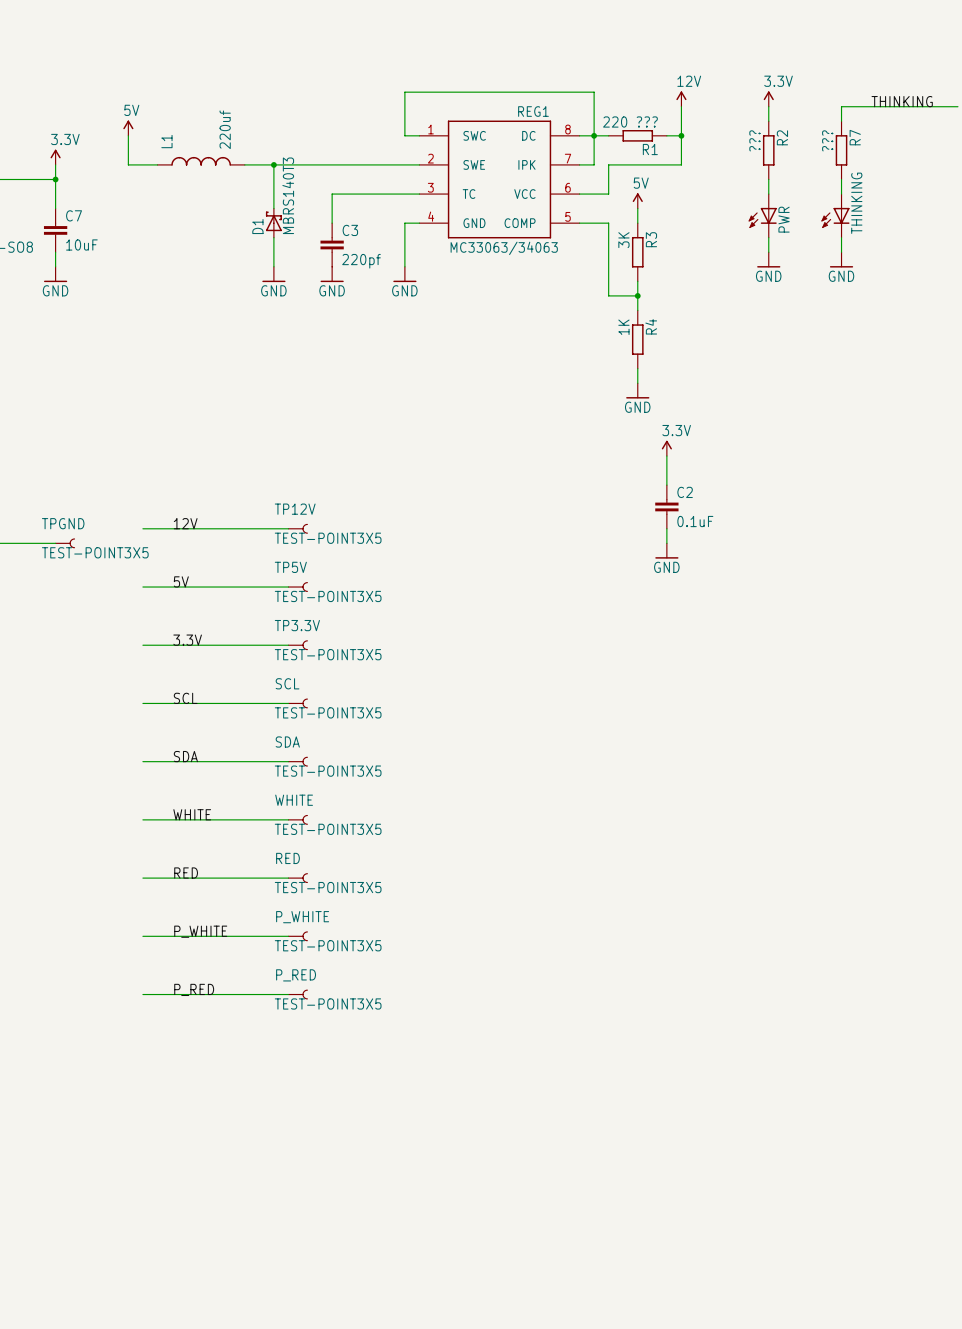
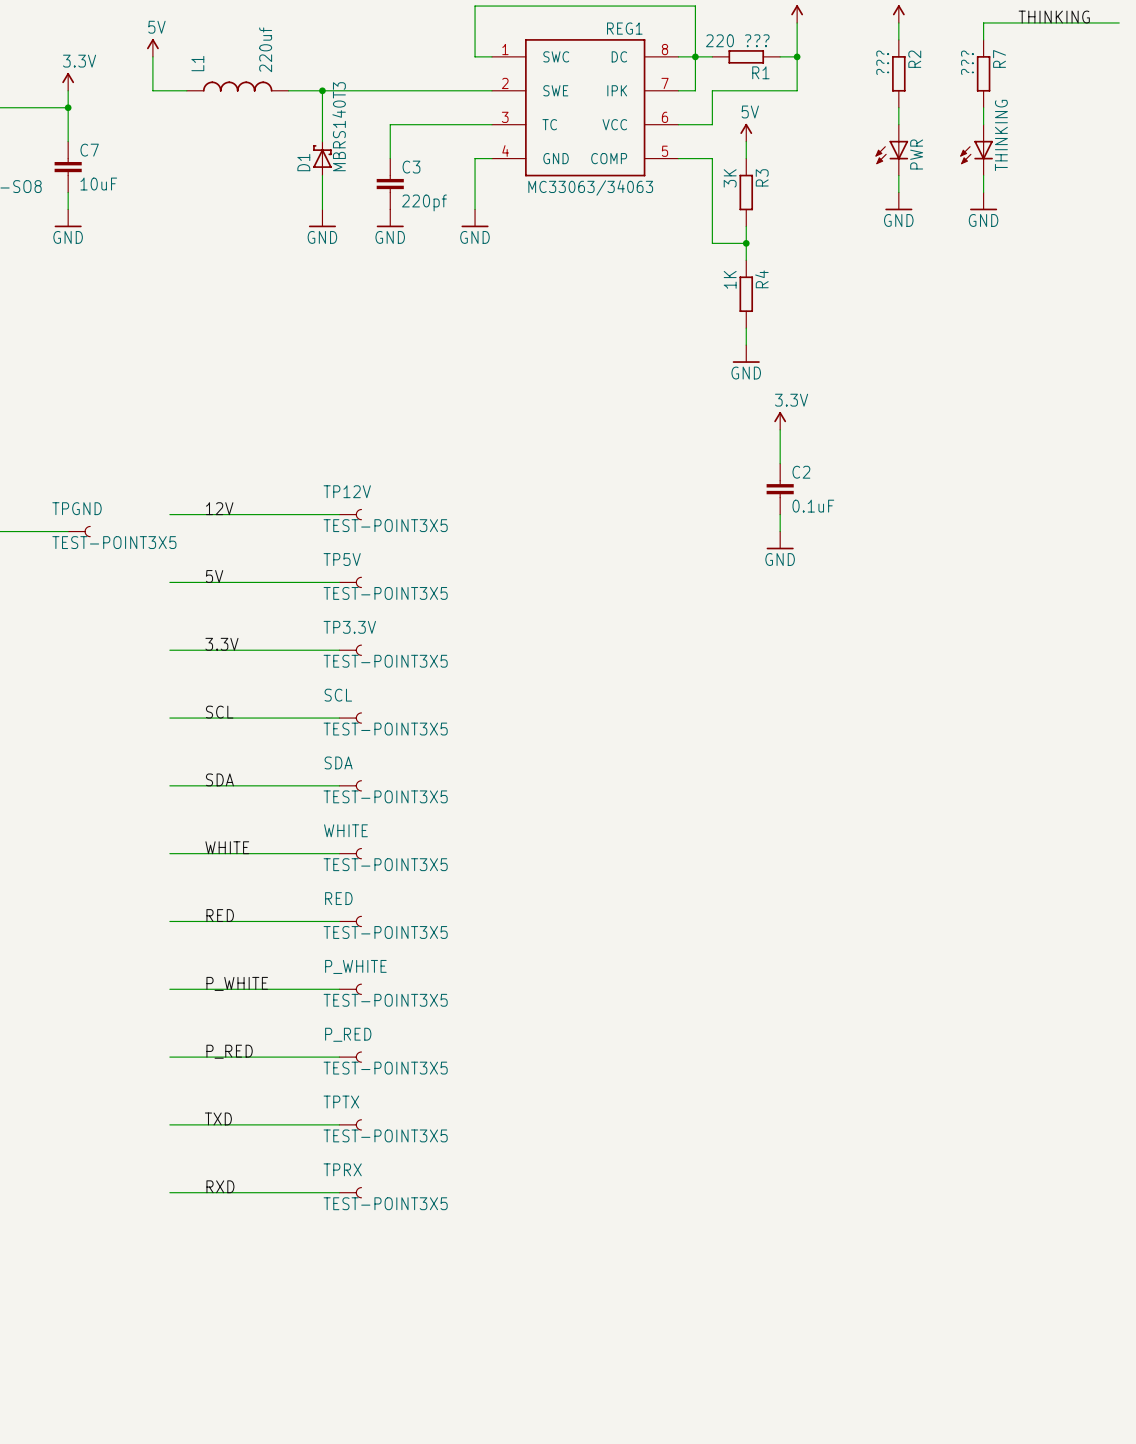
label: none -> TXD (218, 1118)
wire: none -> (169, 1124) (339, 1124)
TPTX: none -> TEST-POINT3X5 (350, 1124)
label: none -> RXD (220, 1186)
wire: none -> (169, 1192) (339, 1192)
TPRX: none -> TEST-POINT3X5 (350, 1192)

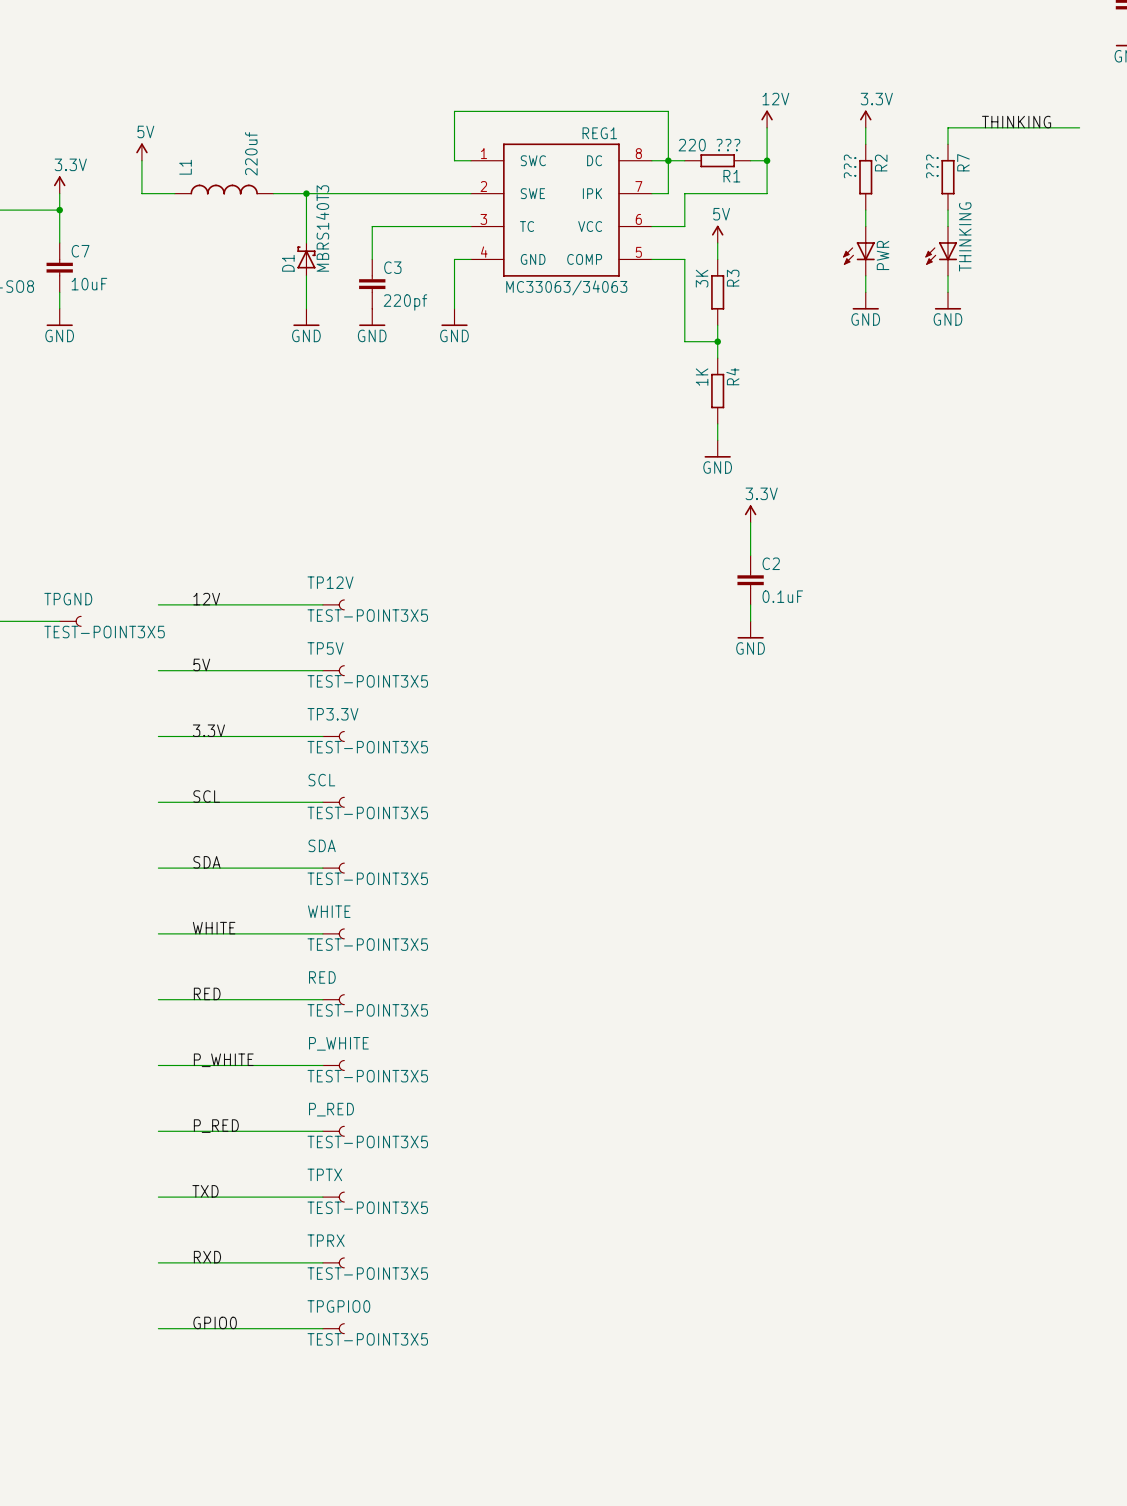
label: none -> GPIO0 (215, 1322)
wire: none -> (158, 1328) (322, 1328)
TPGPIO0: none -> TEST-POINT3X5 (333, 1328)

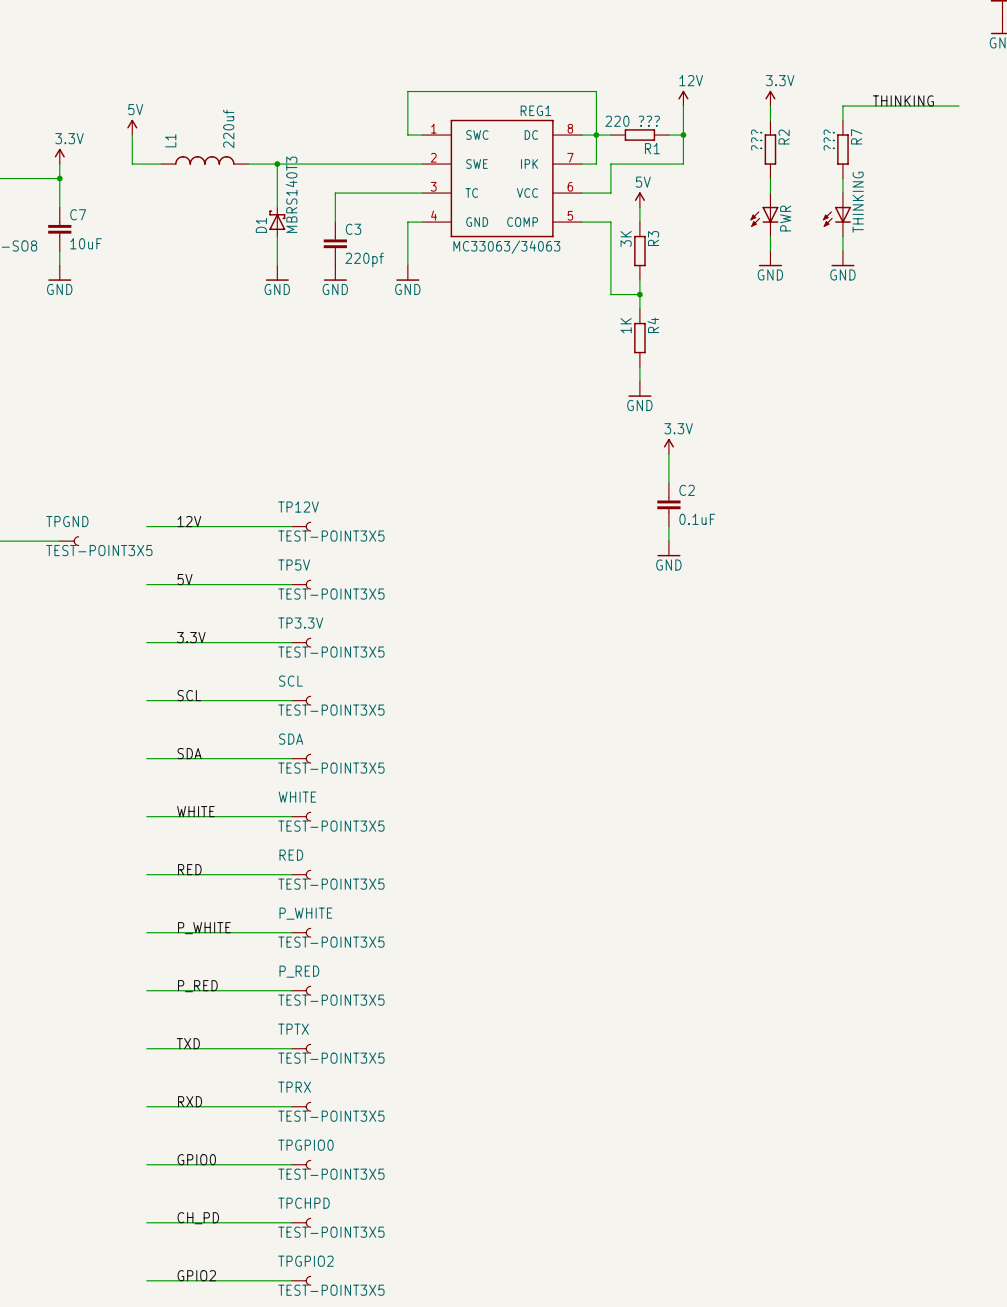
label: none -> CH_PD (198, 1218)
wire: none -> (146, 1222) (291, 1222)
TPCHPD: none -> TEST-POINT3X5 (301, 1222)
label: none -> GPIO2 (196, 1275)
wire: none -> (146, 1280) (291, 1280)
TPGPIO2: none -> TEST-POINT3X5 (301, 1280)

